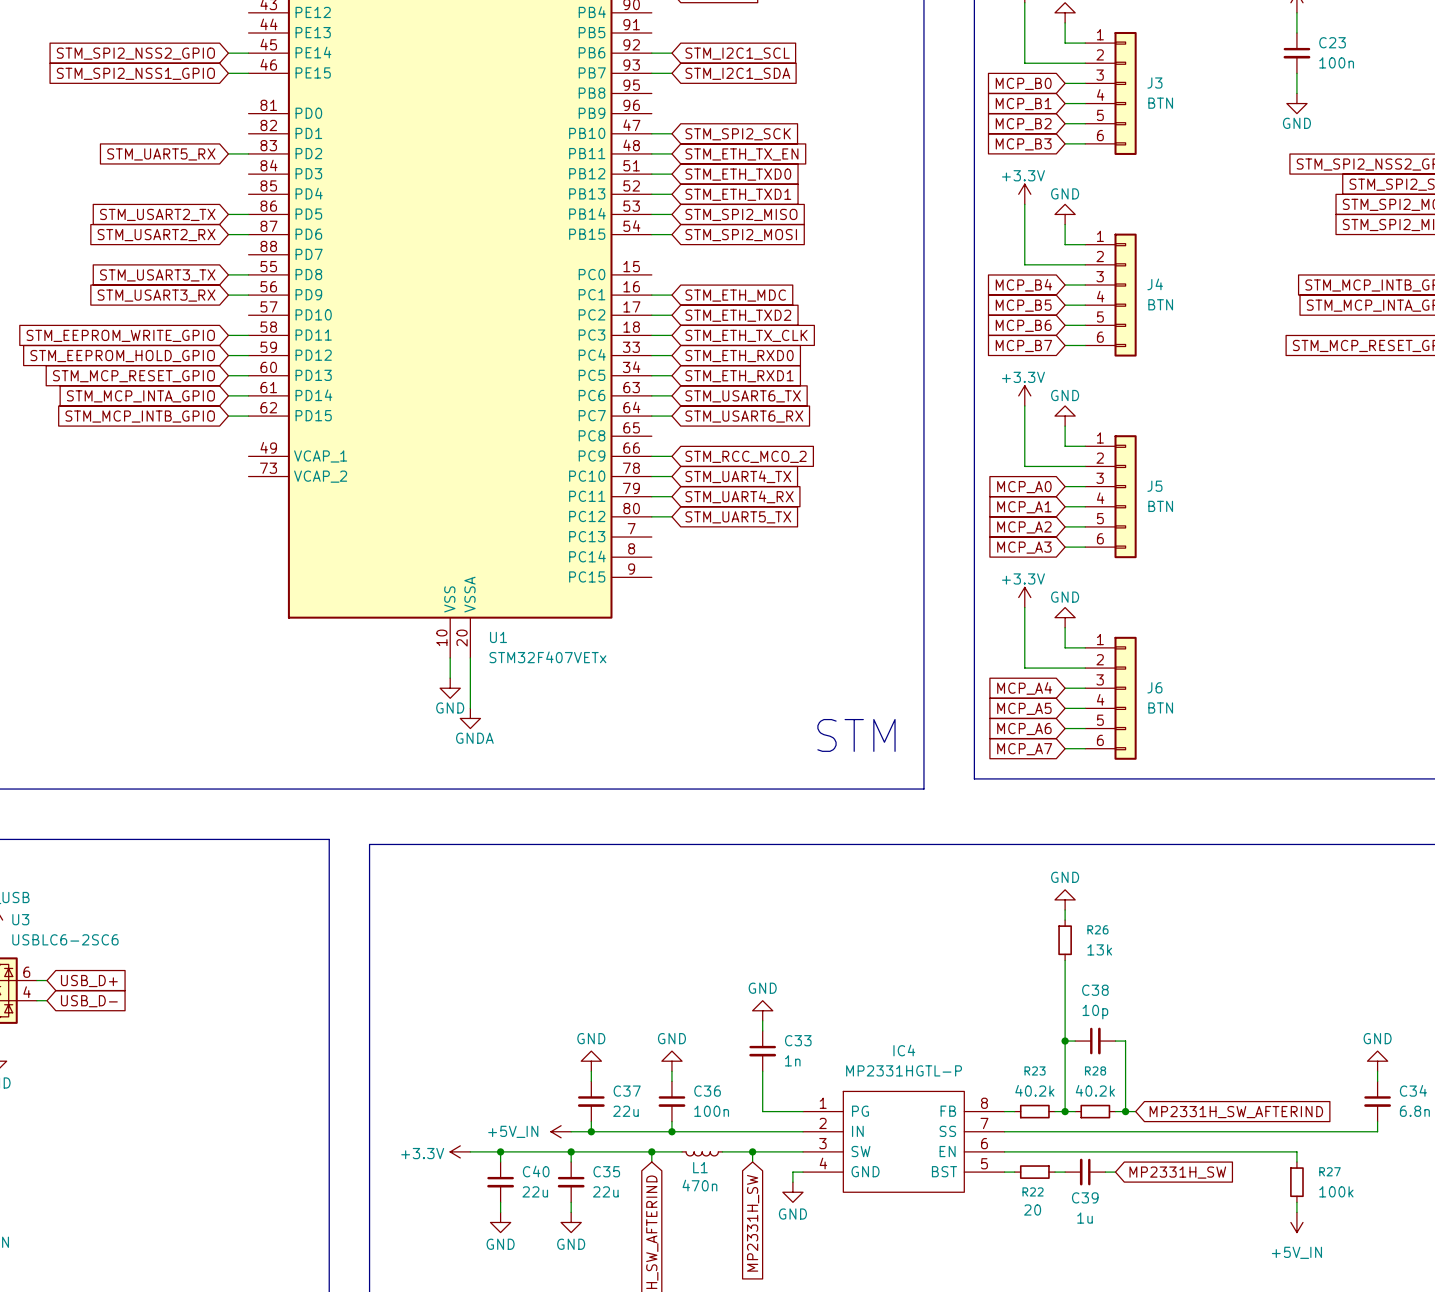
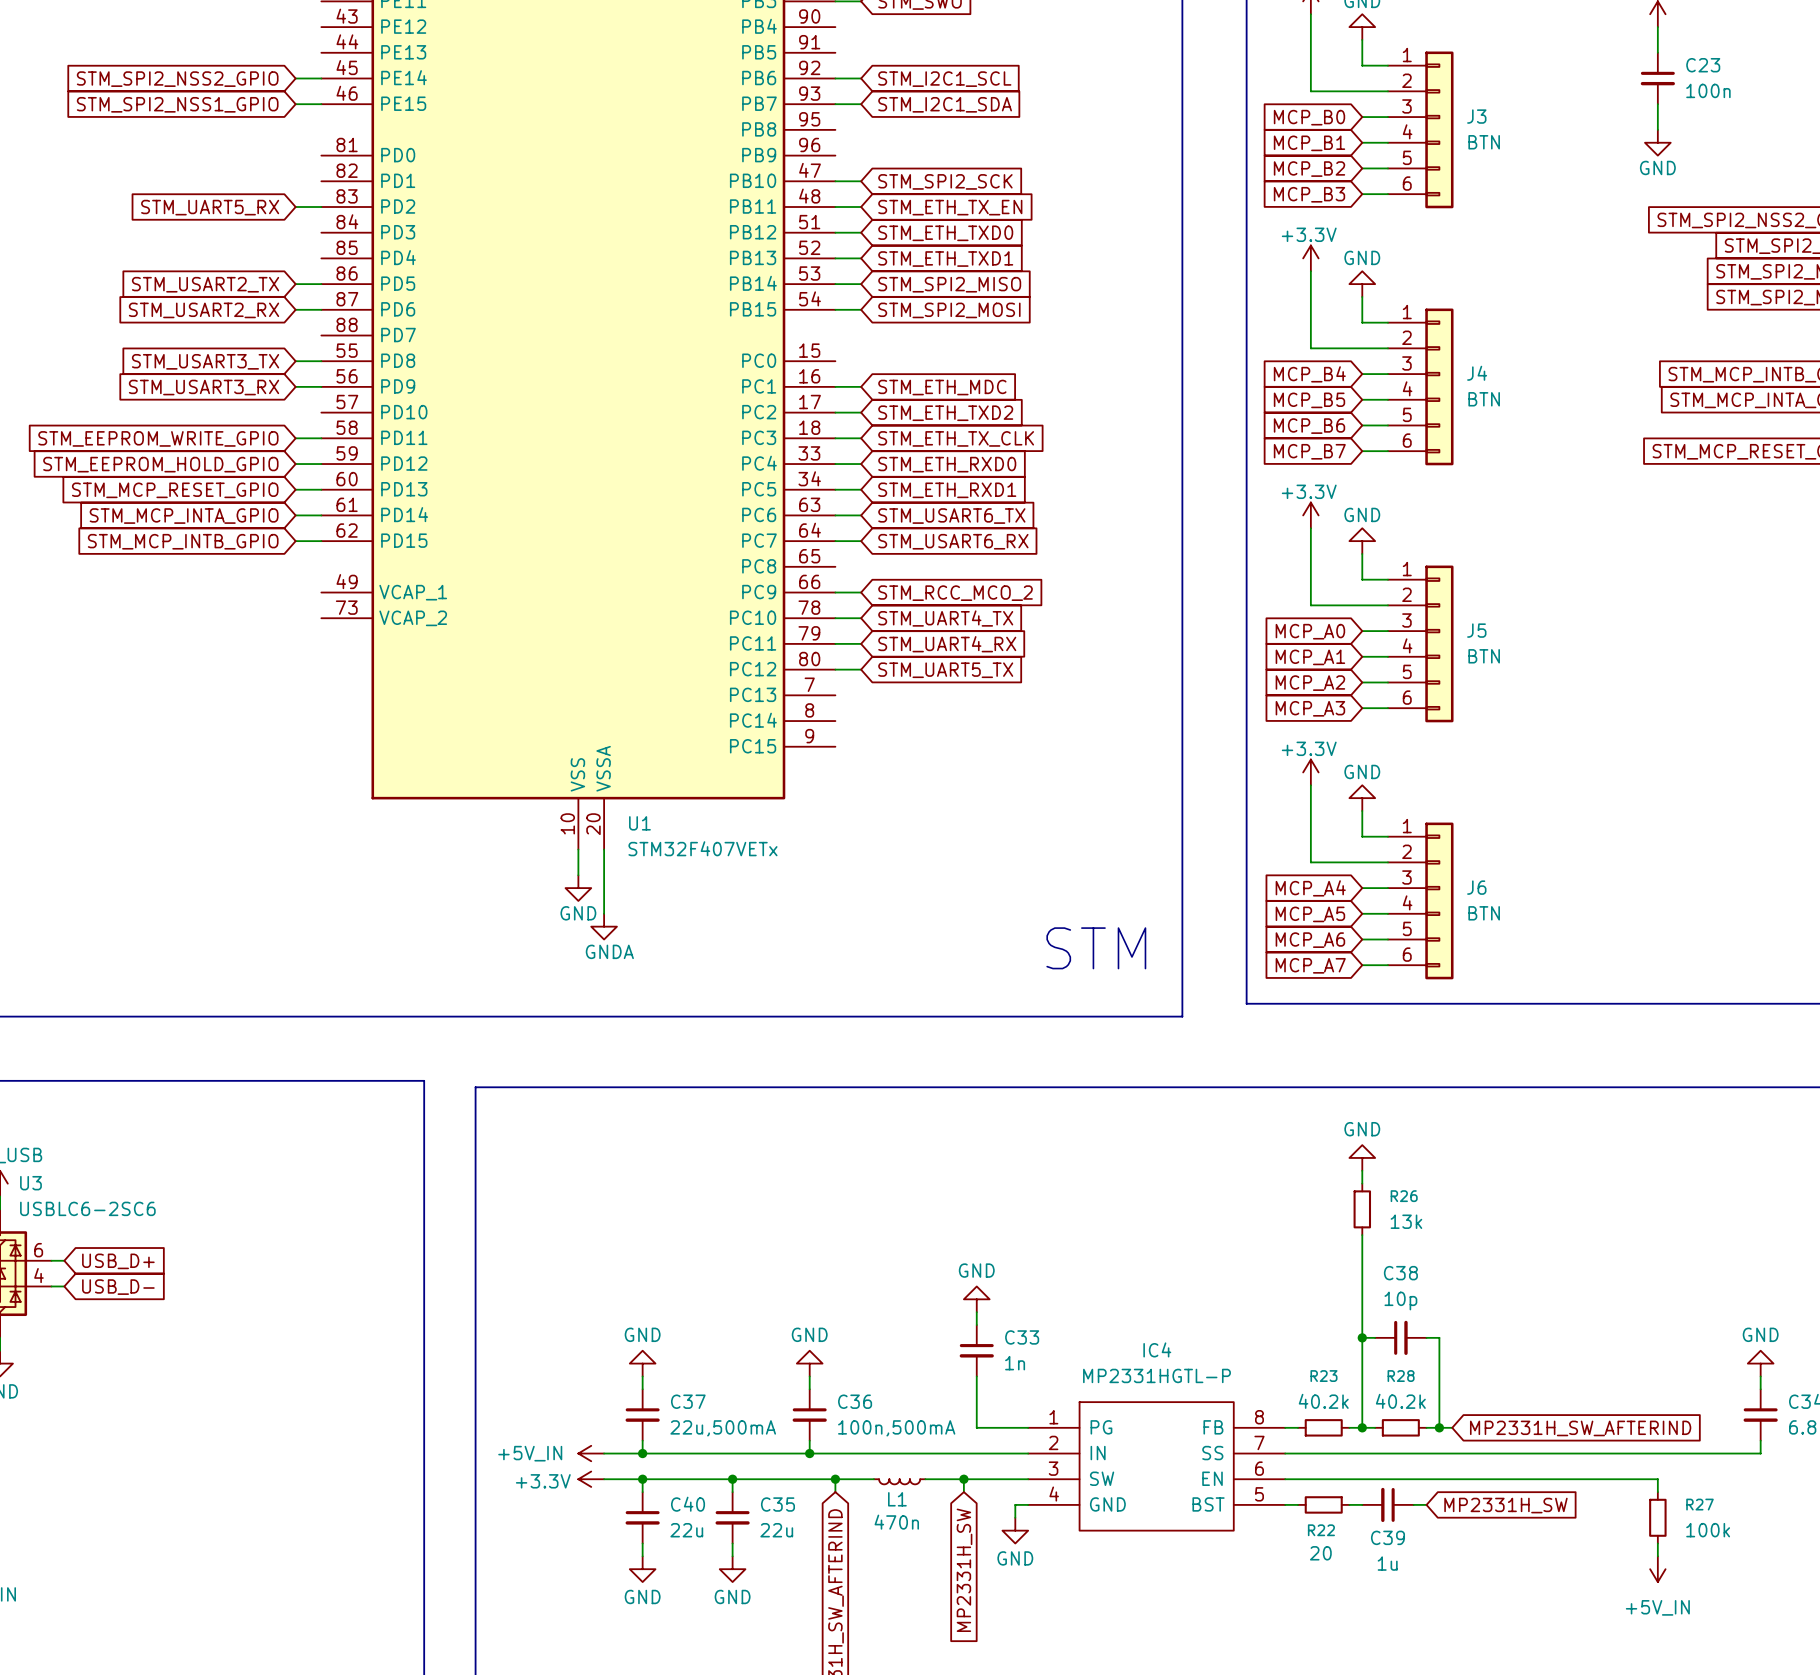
power symbol: none -> GND (642, 1363)
power symbol: GND (591, 1061) -> none
power symbol: none -> GND (809, 1363)
power symbol: GND (671, 1061) -> none
wire: (591, 1071) (591, 1081) -> (642, 1376) (642, 1389)
wire: (671, 1071) (671, 1081) -> (809, 1376) (809, 1389)
C37 position: (591, 1101) -> (642, 1414)
C36 position: (671, 1101) -> (809, 1414)
C37 value: 22u (625, 1111) -> 22u,500mA (723, 1428)
C36 value: 100n (711, 1111) -> 100n,500mA (896, 1428)
wire: (591, 1121) (591, 1131) -> (642, 1440) (642, 1453)
wire: (671, 1121) (671, 1131) -> (809, 1440) (809, 1453)
wire: none -> (604, 1453) (732, 1453)
junction: none -> (642, 1453)
power symbol position: +5V_IN (561, 1131) -> +5V_IN (591, 1453)
junction: (591, 1131) -> none
junction: none -> (809, 1453)
junction: (671, 1131) -> none

